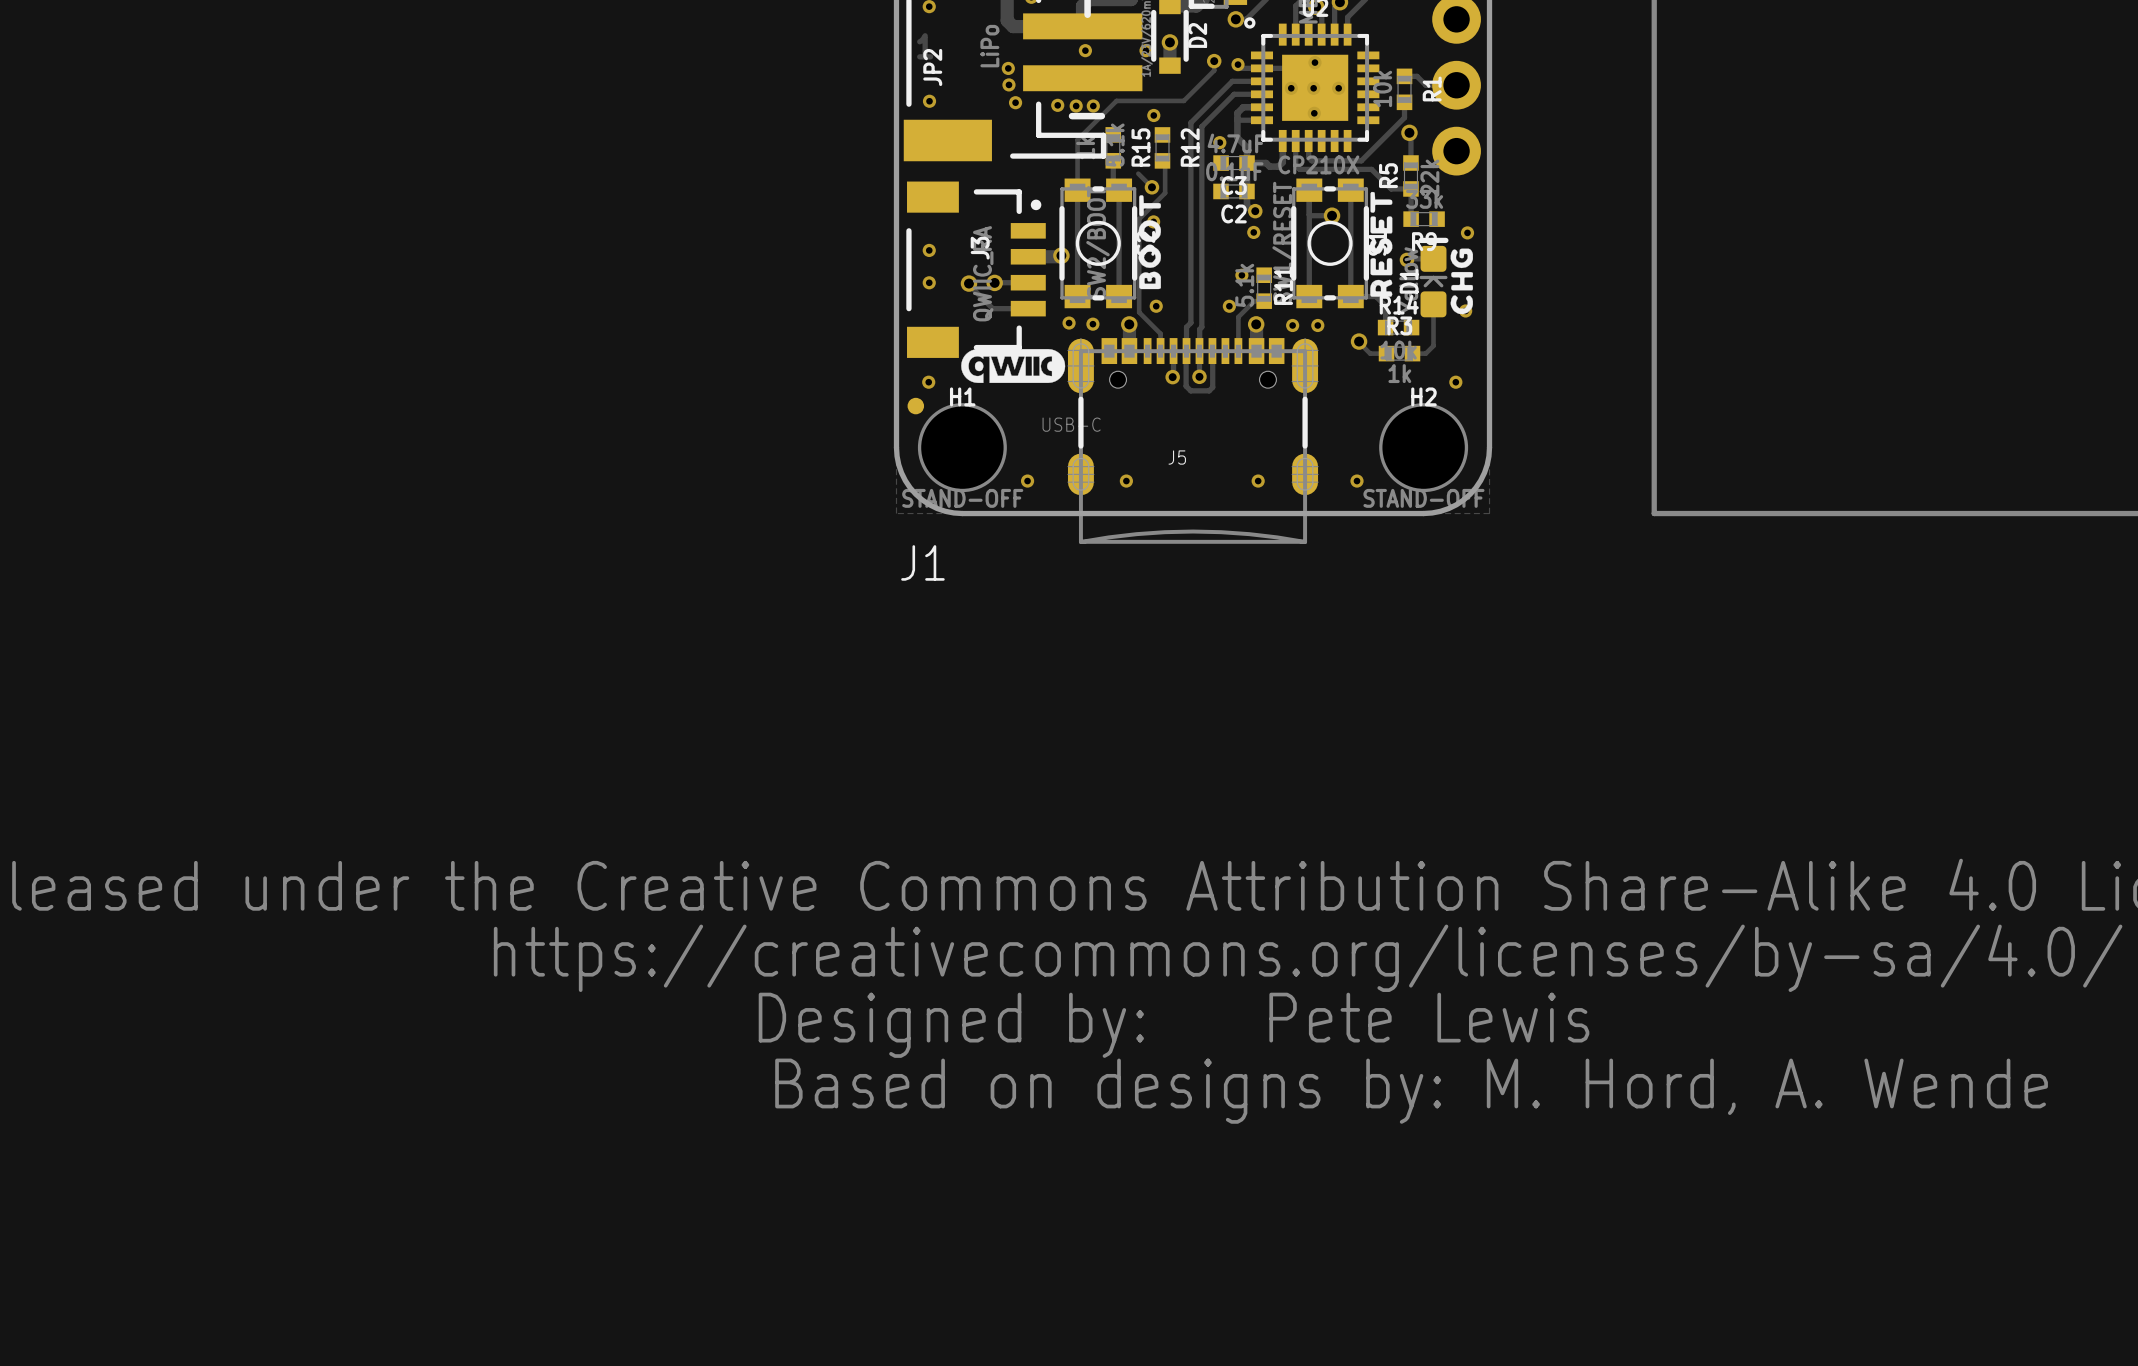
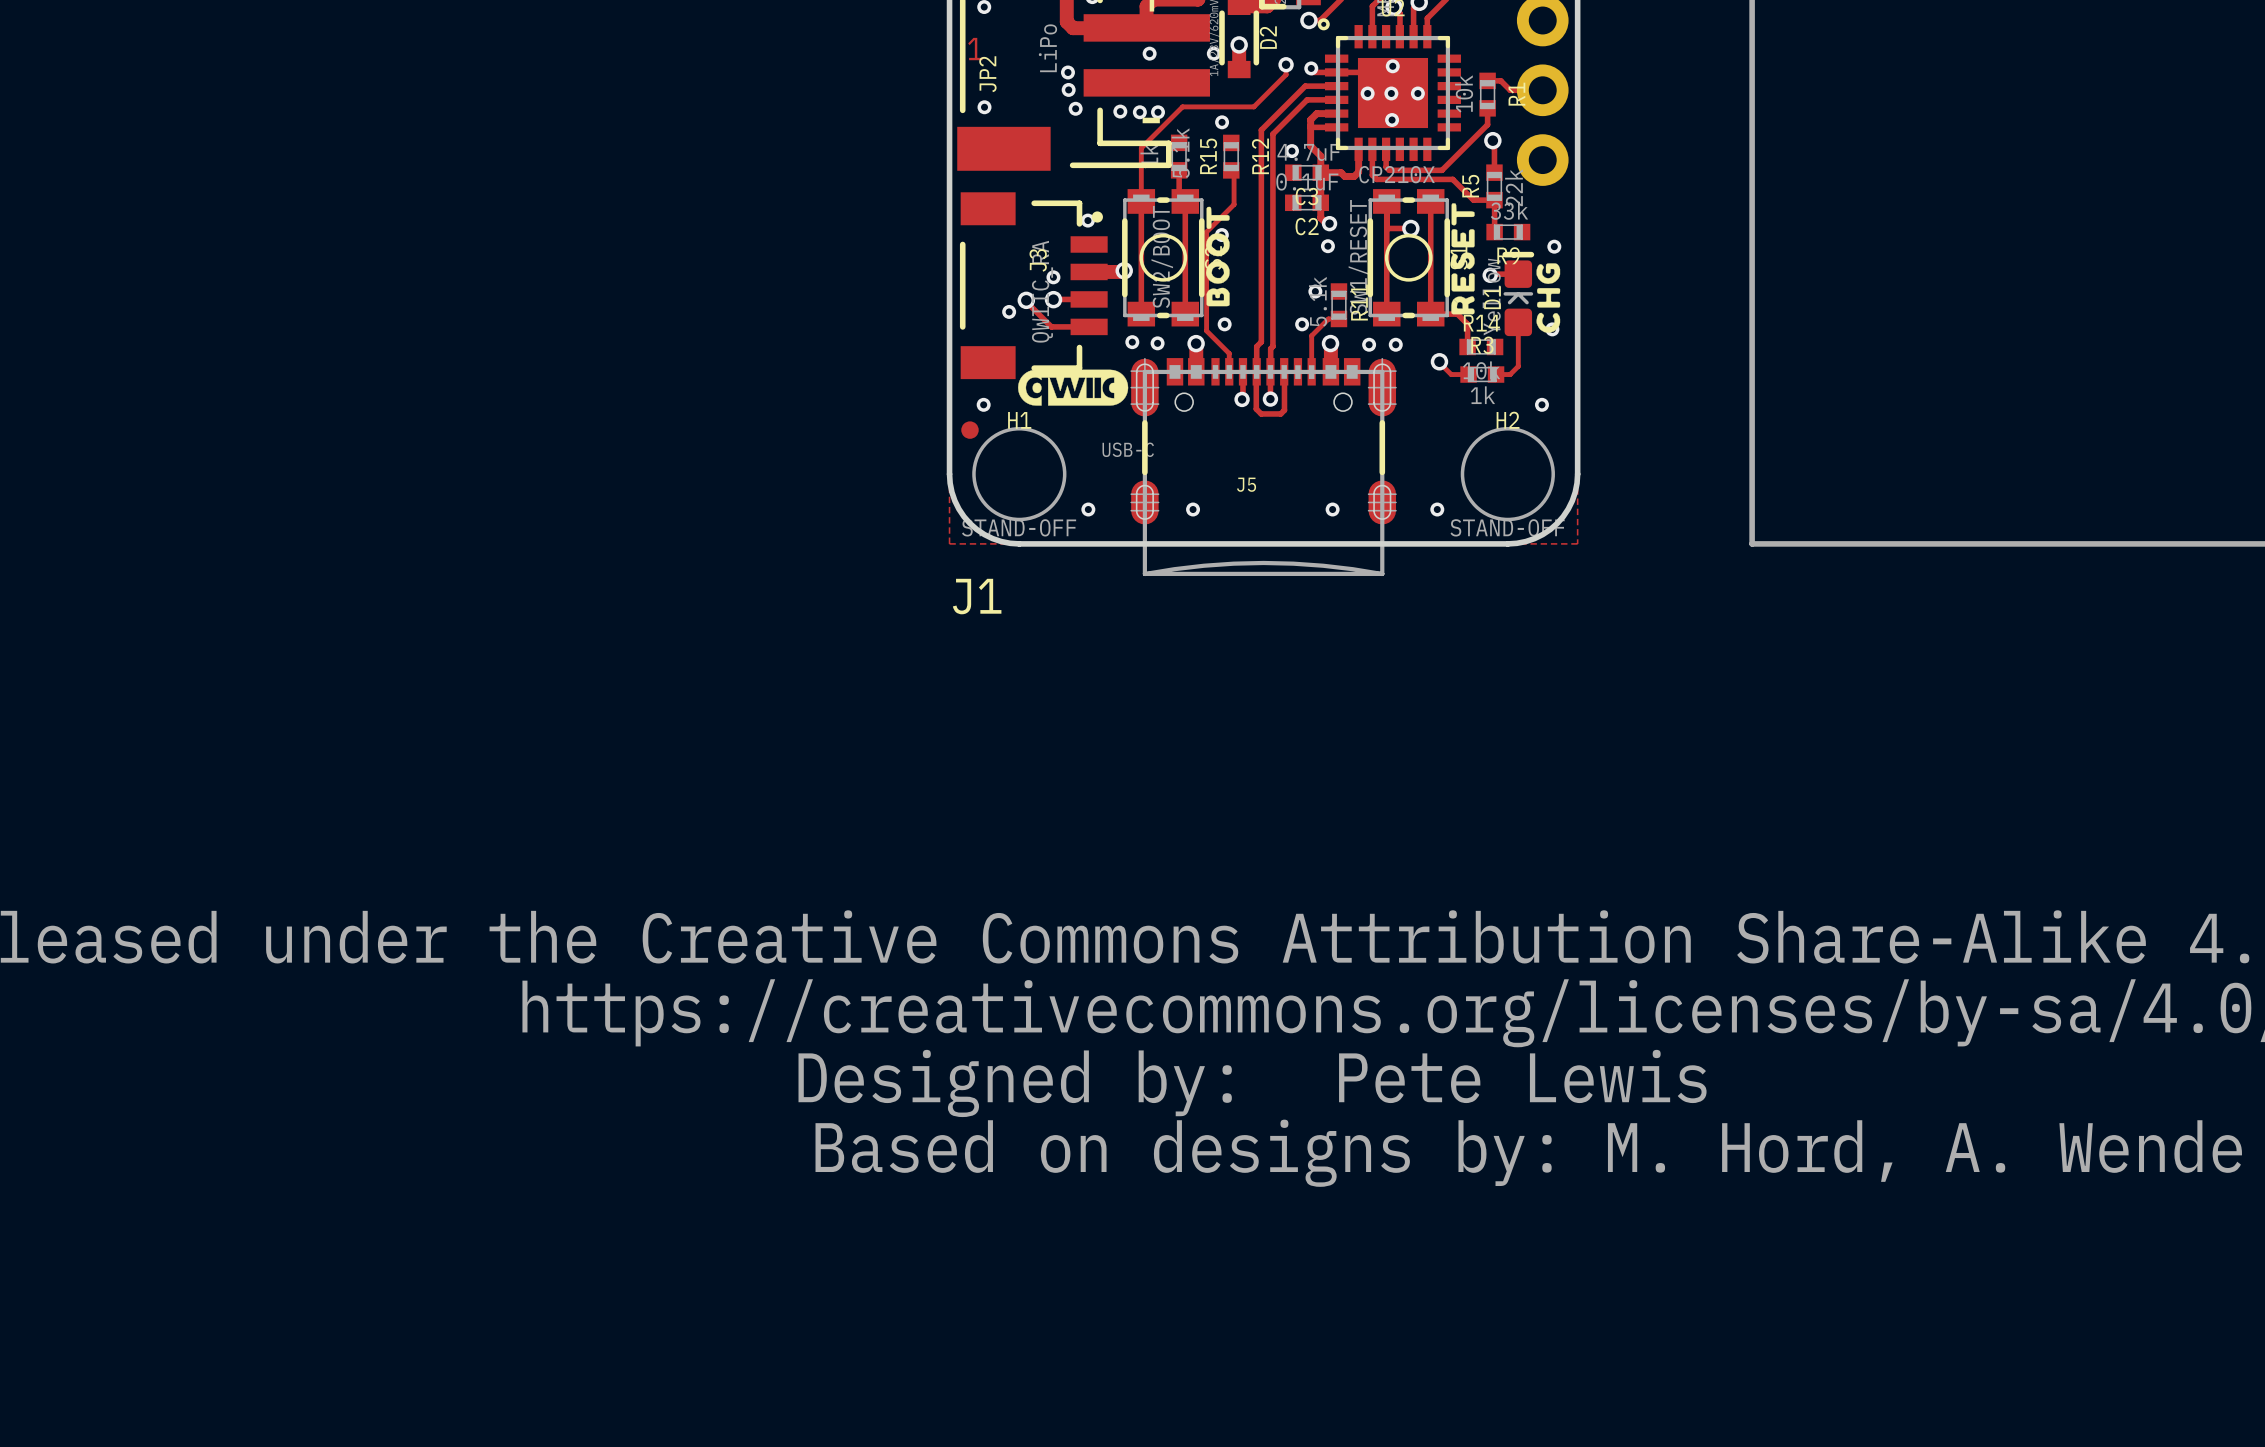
track: (1138, 173) (1151, 187) -> none
via: (1151, 187) -> none
via: none -> (1087, 220)
via: (929, 250) -> none
via: none -> (1053, 277)
via: (929, 282) -> none
via: none -> (1009, 311)

